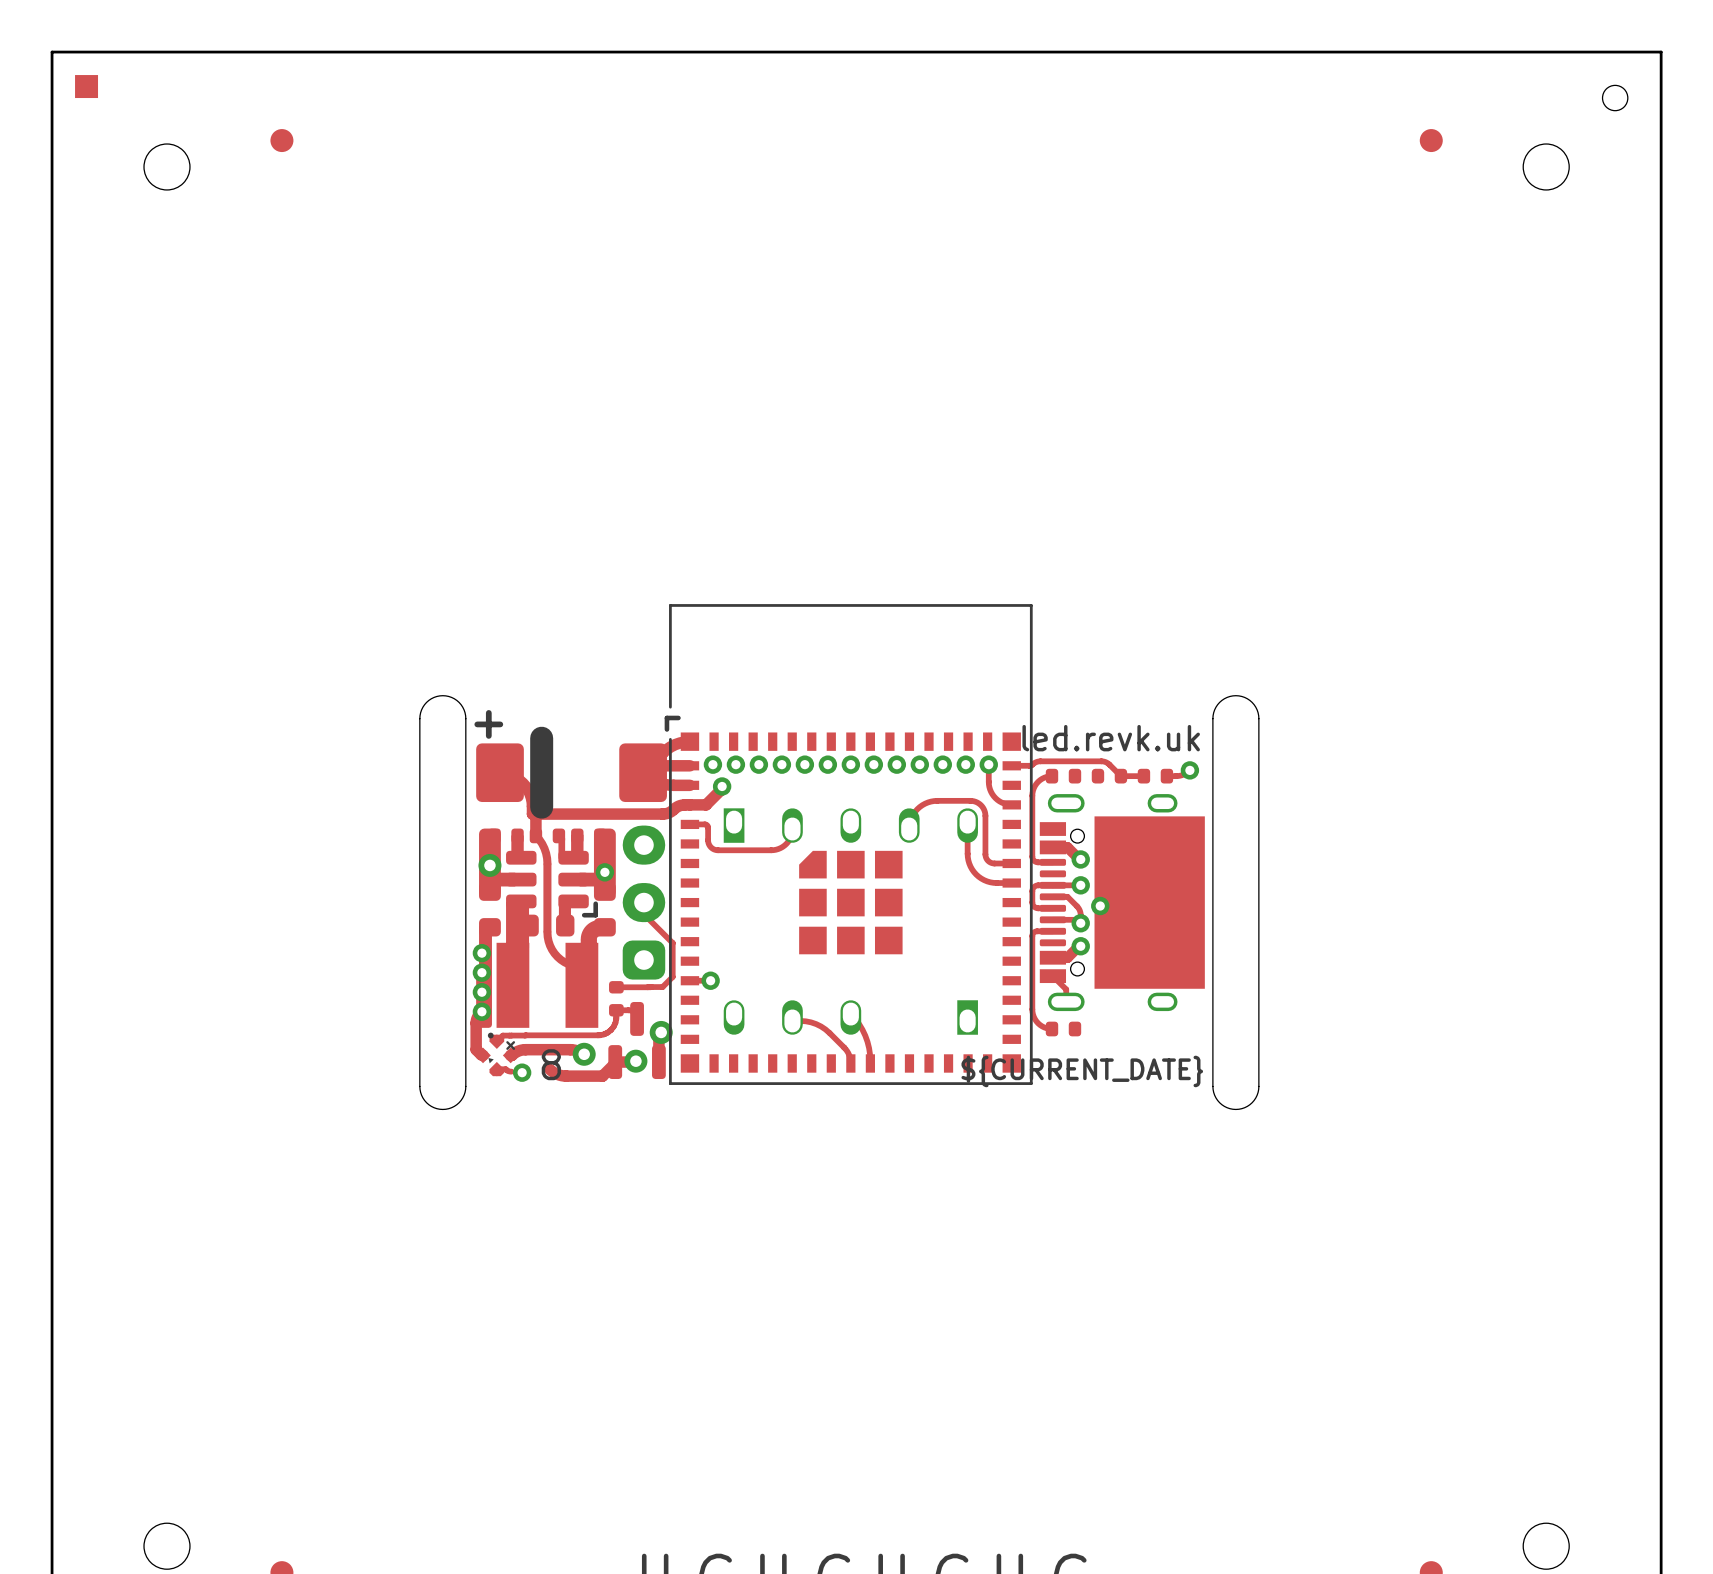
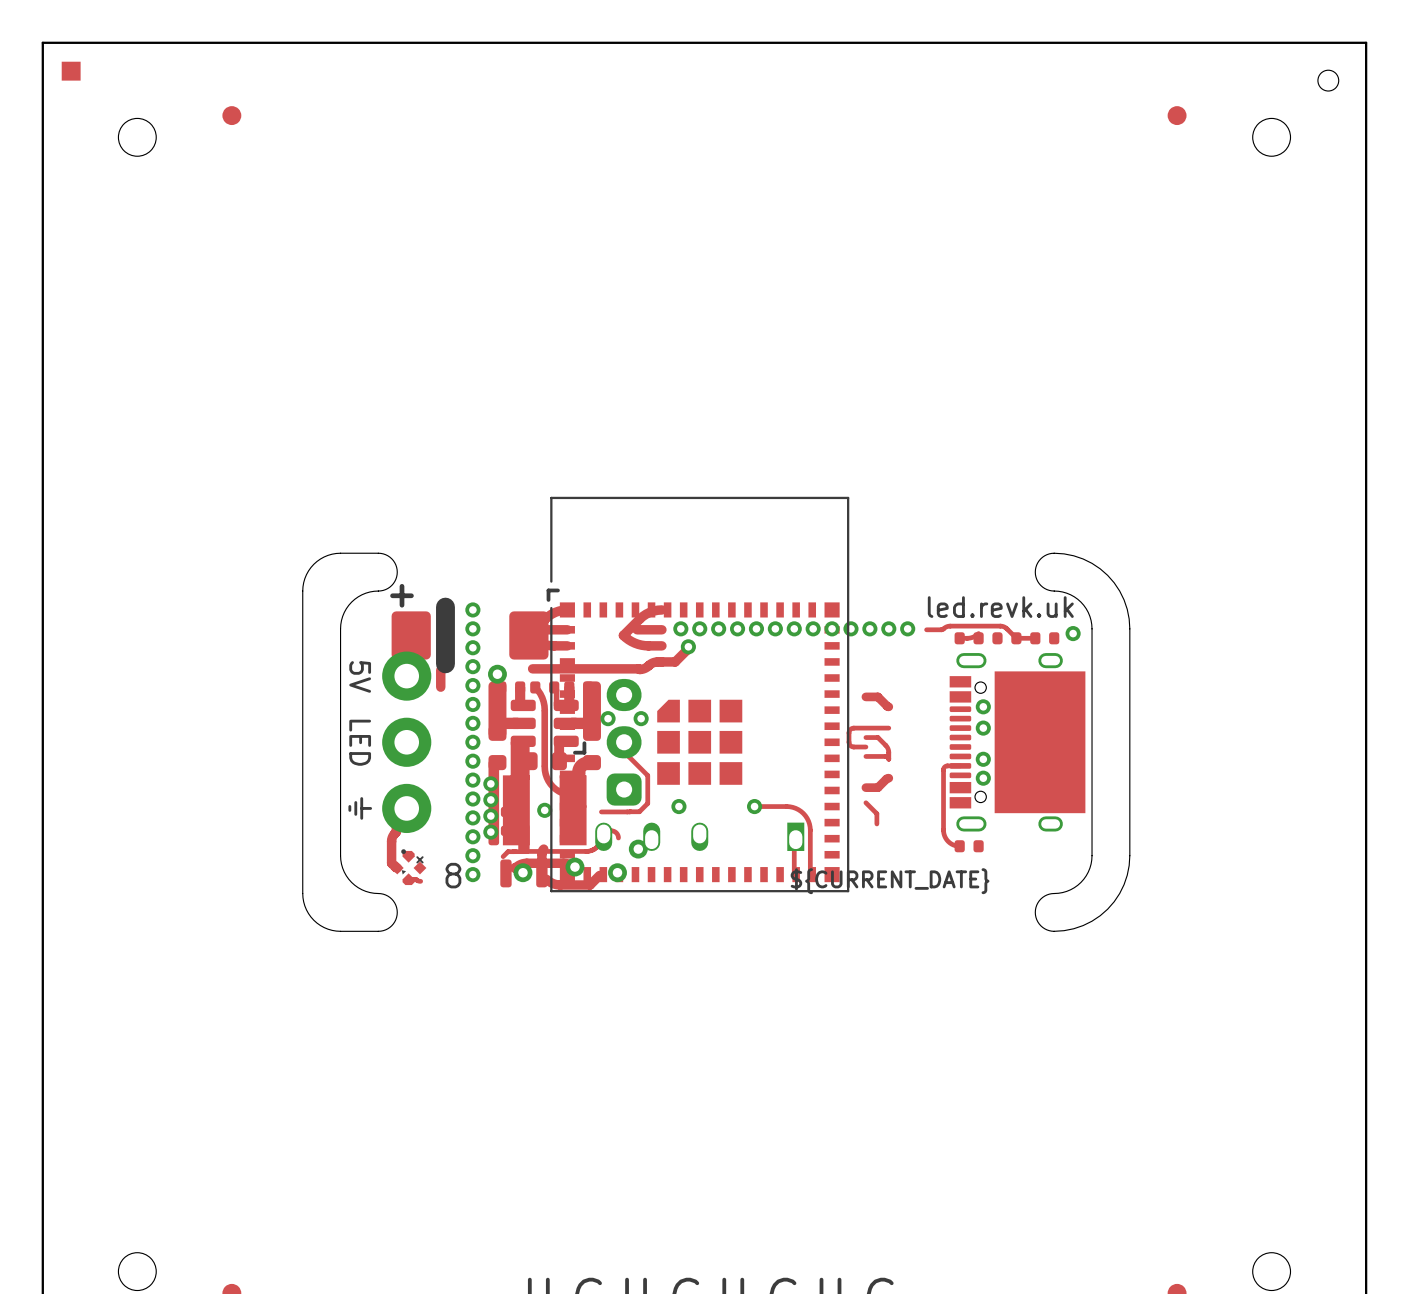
board edge: none -> (340, 553) (383, 553) (391, 558) (397, 569) (395, 579) (389, 587) (383, 590) (365, 593) (351, 602) (344, 612) (340, 628) (340, 859) (346, 875) (354, 885) (365, 891) (385, 894) (394, 902) (397, 912) (395, 919) (389, 927) (380, 931) (336, 931) (324, 927) (310, 917) (302, 897) (302, 586) (306, 574) (316, 561) (328, 555) (340, 553)
board edge: none -> (1054, 553) (1044, 555) (1037, 562) (1035, 572) (1037, 581) (1046, 589) (1066, 593) (1077, 599) (1088, 612) (1092, 628) (1091, 859) (1086, 875) (1077, 885) (1066, 891) (1046, 894) (1037, 902) (1035, 912) (1037, 921) (1044, 928) (1054, 931) (1083, 925) (1107, 909) (1124, 884) (1129, 855) (1129, 628) (1127, 609) (1114, 582) (1100, 568) (1083, 558) (1054, 553)
board edge: (419, 718) (419, 1086) (421, 1095) (426, 1102) (434, 1107) (442, 1109) (451, 1107) (459, 1102) (464, 1095) (465, 1086) (465, 718) (464, 709) (459, 702) (451, 697) (442, 695) (434, 697) (426, 702) (421, 709) (419, 718) -> none
board edge: (1212, 718) (1212, 1086) (1214, 1095) (1219, 1102) (1227, 1107) (1235, 1109) (1244, 1107) (1252, 1102) (1257, 1095) (1258, 1086) (1258, 718) (1257, 709) (1252, 702) (1244, 697) (1235, 695) (1227, 697) (1219, 702) (1214, 709) (1212, 718) -> none
text position: led.revk.uk (1111, 738) -> led.revk.uk (1000, 607)
via: none -> (472, 609)
track: none -> (661, 609) (646, 614) (623, 635) (638, 644) (661, 645)
via: none -> (472, 628)
via: (712, 764) -> none
via: (735, 764) -> none
via: (758, 764) -> none
via: (781, 764) -> none
via: (804, 764) -> none
track: (988, 764) (988, 784) (992, 794) (999, 801) (1011, 804) -> none
via: none -> (832, 628)
via: none -> (850, 628)
via: none -> (869, 628)
via: none -> (888, 628)
via: none -> (907, 628)
track: none -> (637, 629) (661, 629)
track: (1011, 765) (1030, 765) (1040, 761) (1102, 761) (1108, 763) (1120, 776) (1143, 776) -> (926, 629) (941, 629) (950, 626) (1001, 626) (1006, 628) (1016, 638) (1035, 638)
via: (1189, 770) -> none
via: none -> (1073, 633)
track: (500, 773) (516, 778) (525, 786) (531, 797) (532, 814) (664, 814) (681, 805) (706, 804) (722, 786) -> none
track: (1051, 776) (1040, 780) (1033, 790) (1032, 856) (1036, 862) (1052, 862) -> none
part: (1063, 776) -> none
part position: (1109, 776) -> (1006, 638)
part position: (1155, 776) -> (969, 638)
part: none -> (1044, 638)
via: (722, 786) -> none
track: none -> (688, 646) (675, 661) (655, 662) (640, 669) (532, 668)
via: none -> (688, 646)
via: none -> (472, 647)
via: none -> (472, 666)
via: none -> (497, 674)
track: (967, 822) (967, 857) (973, 872) (987, 881) (1011, 883) -> none
text: none -> 5V (360, 676)
track: (689, 824) (707, 825) (709, 844) (712, 848) (718, 850) (775, 849) (787, 842) (792, 829) -> none
part: (850, 825) -> none
track: (909, 829) (913, 814) (919, 807) (928, 802) (975, 801) (981, 805) (985, 812) (986, 858) (993, 863) (1011, 863) -> none
via: none -> (472, 685)
via: none -> (472, 704)
via: (1080, 859) -> none
via: none -> (983, 706)
via: (489, 865) -> none
via: (604, 872) -> none
via: none -> (608, 718)
via: none -> (641, 718)
via: none -> (472, 723)
via: (1080, 885) -> none
via: none -> (983, 728)
part: none -> (406, 742)
via: none -> (472, 742)
track: (643, 902) (648, 919) (672, 943) (672, 976) (662, 987) (616, 987) -> none
part position: (643, 902) -> (624, 742)
part position: (1122, 902) -> (1017, 742)
text: none -> LED (360, 742)
via: (1100, 906) -> none
track: none -> (627, 754) (647, 775) (647, 803) (639, 811) (601, 811)
via: (1080, 923) -> none
via: none -> (983, 759)
via: none -> (472, 761)
part position: (547, 928) -> (544, 763)
track: (1052, 931) (1035, 931) (1032, 936) (1033, 1014) (1040, 1024) (1051, 1029) -> (960, 765) (946, 766) (943, 769) (944, 834) (949, 842) (959, 846)
via: (1080, 946) -> none
via: none -> (983, 778)
via: none -> (472, 780)
via: (481, 953) -> none
via: none -> (490, 783)
via: none -> (472, 798)
via: (481, 972) -> none
via: none -> (490, 799)
via position: (710, 980) -> (544, 810)
via: none -> (678, 806)
track: none -> (754, 806) (789, 806) (798, 809) (805, 815) (810, 827) (810, 874)
via: none -> (754, 806)
text: none -> ⏚ (360, 808)
via: (481, 992) -> none
via: none -> (490, 816)
via: none -> (472, 817)
via: (481, 1011) -> none
via: none -> (490, 832)
track: (850, 1014) (865, 1035) (870, 1061) -> none
via: none -> (472, 836)
track: (637, 1018) (632, 1011) (616, 1010) (613, 1026) (604, 1034) (502, 1035) (496, 1041) -> (618, 837) (614, 831) (601, 830) (599, 844) (591, 850) (508, 851) (503, 856)
track: none -> (794, 838) (794, 874)
track: (792, 1020) (811, 1022) (825, 1029) (845, 1049) (850, 1063) -> none
part position: (1063, 1029) -> (969, 846)
via position: (661, 1032) -> (574, 867)
via: none -> (638, 849)
via: none -> (472, 855)
track: (584, 1054) (572, 1049) (525, 1049) (510, 1055) -> (574, 867) (565, 863) (526, 863) (514, 867)
via: (584, 1054) -> none
track: (635, 1061) (615, 1062) (602, 1076) (564, 1076) (549, 1069) -> none
via: none -> (617, 872)
via: none -> (472, 874)
track: none -> (599, 875) (590, 885) (558, 884) (546, 879)
via: (522, 1072) -> none

